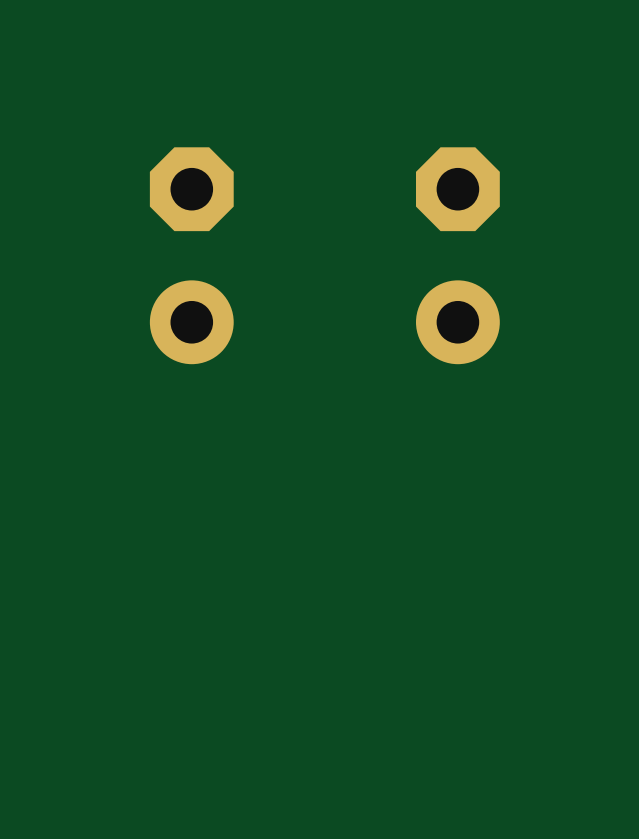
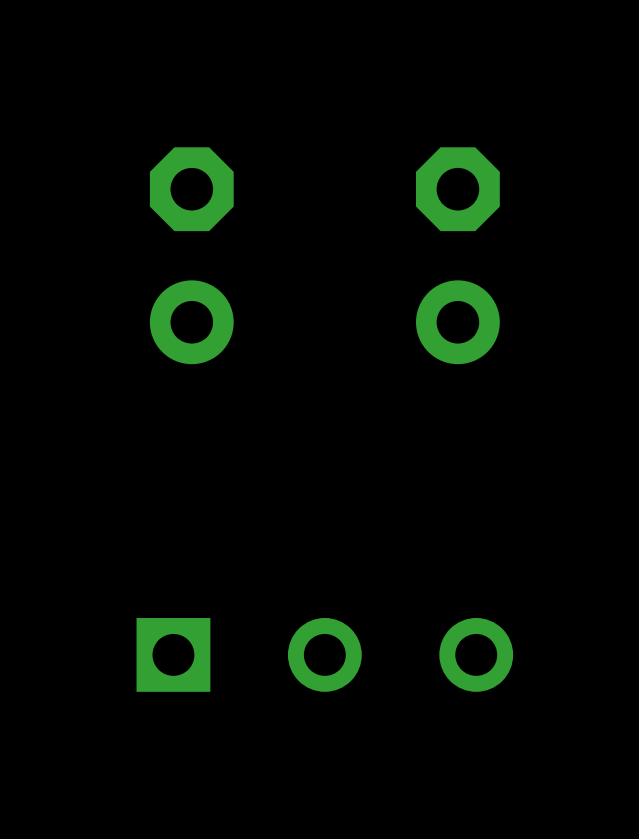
part: none -> (324, 654)

